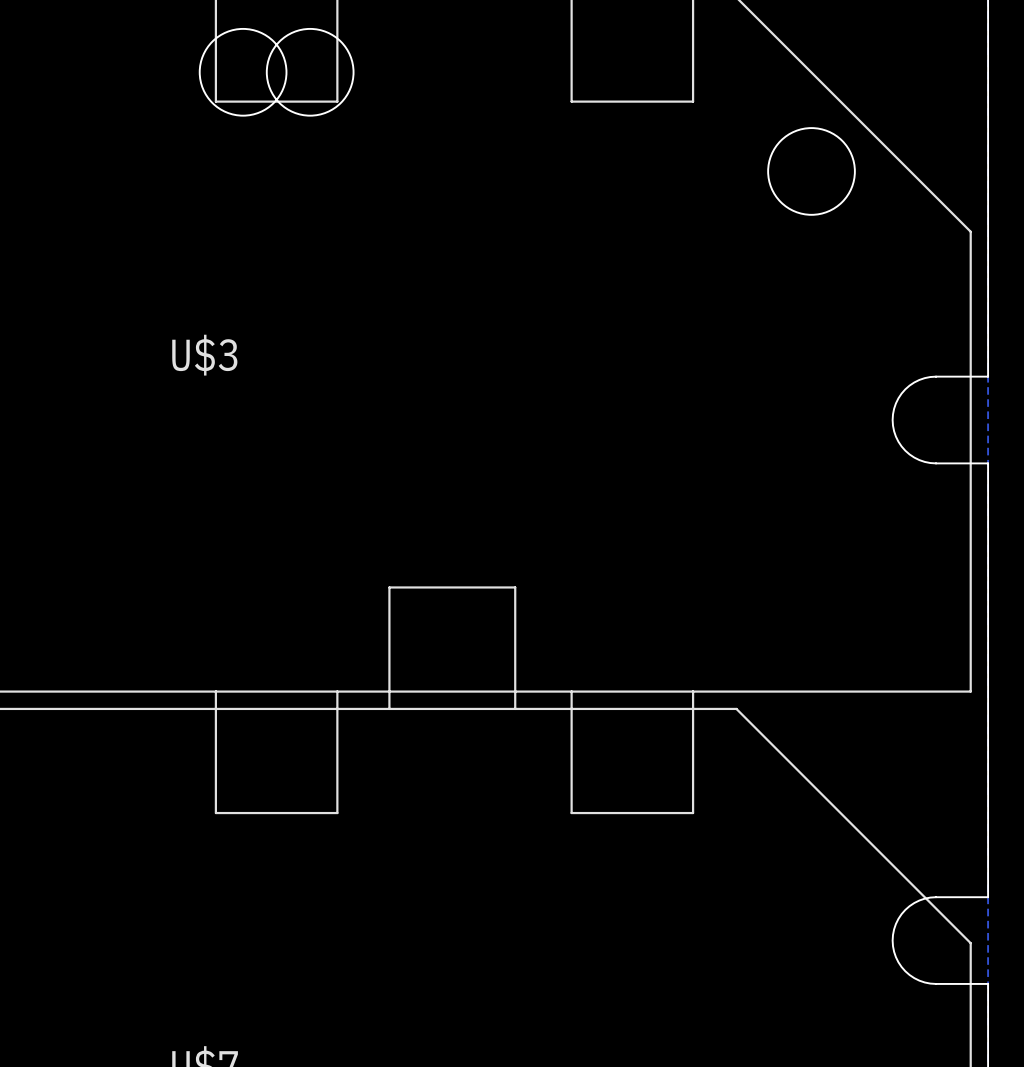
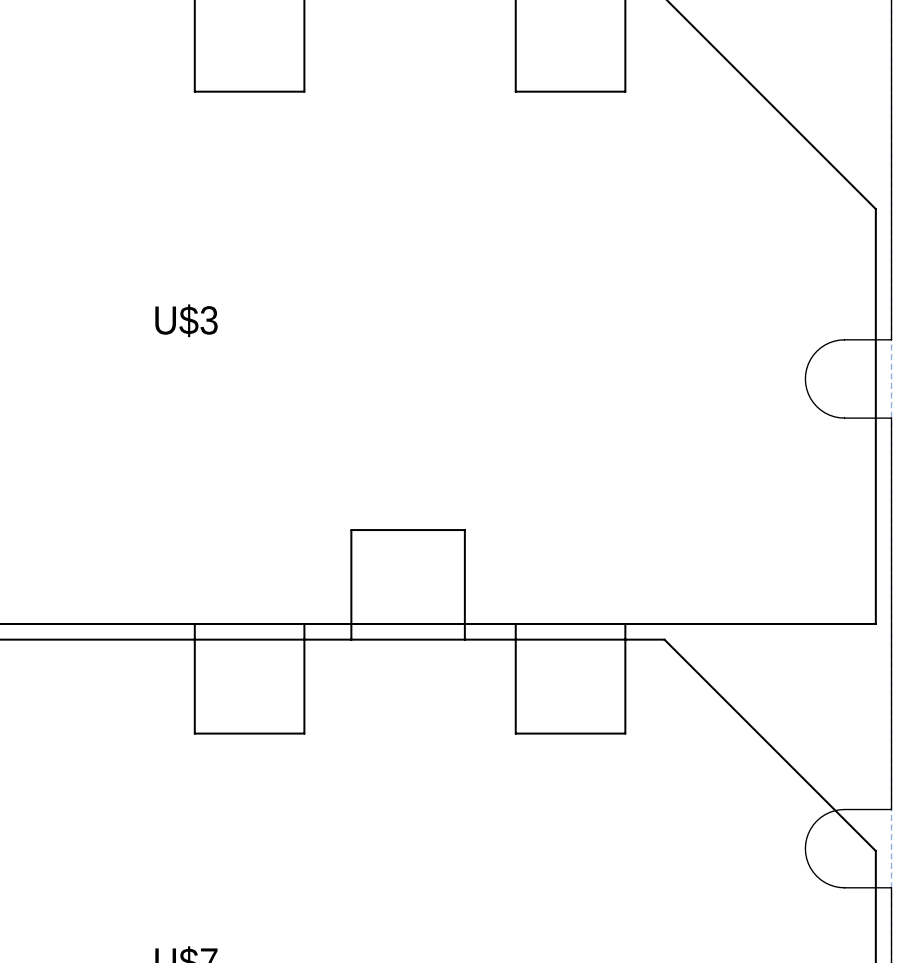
round board edge: [198, 28, 288, 117] -> none
round board edge: [265, 28, 355, 117] -> none
round board edge: [767, 127, 856, 216] -> none

